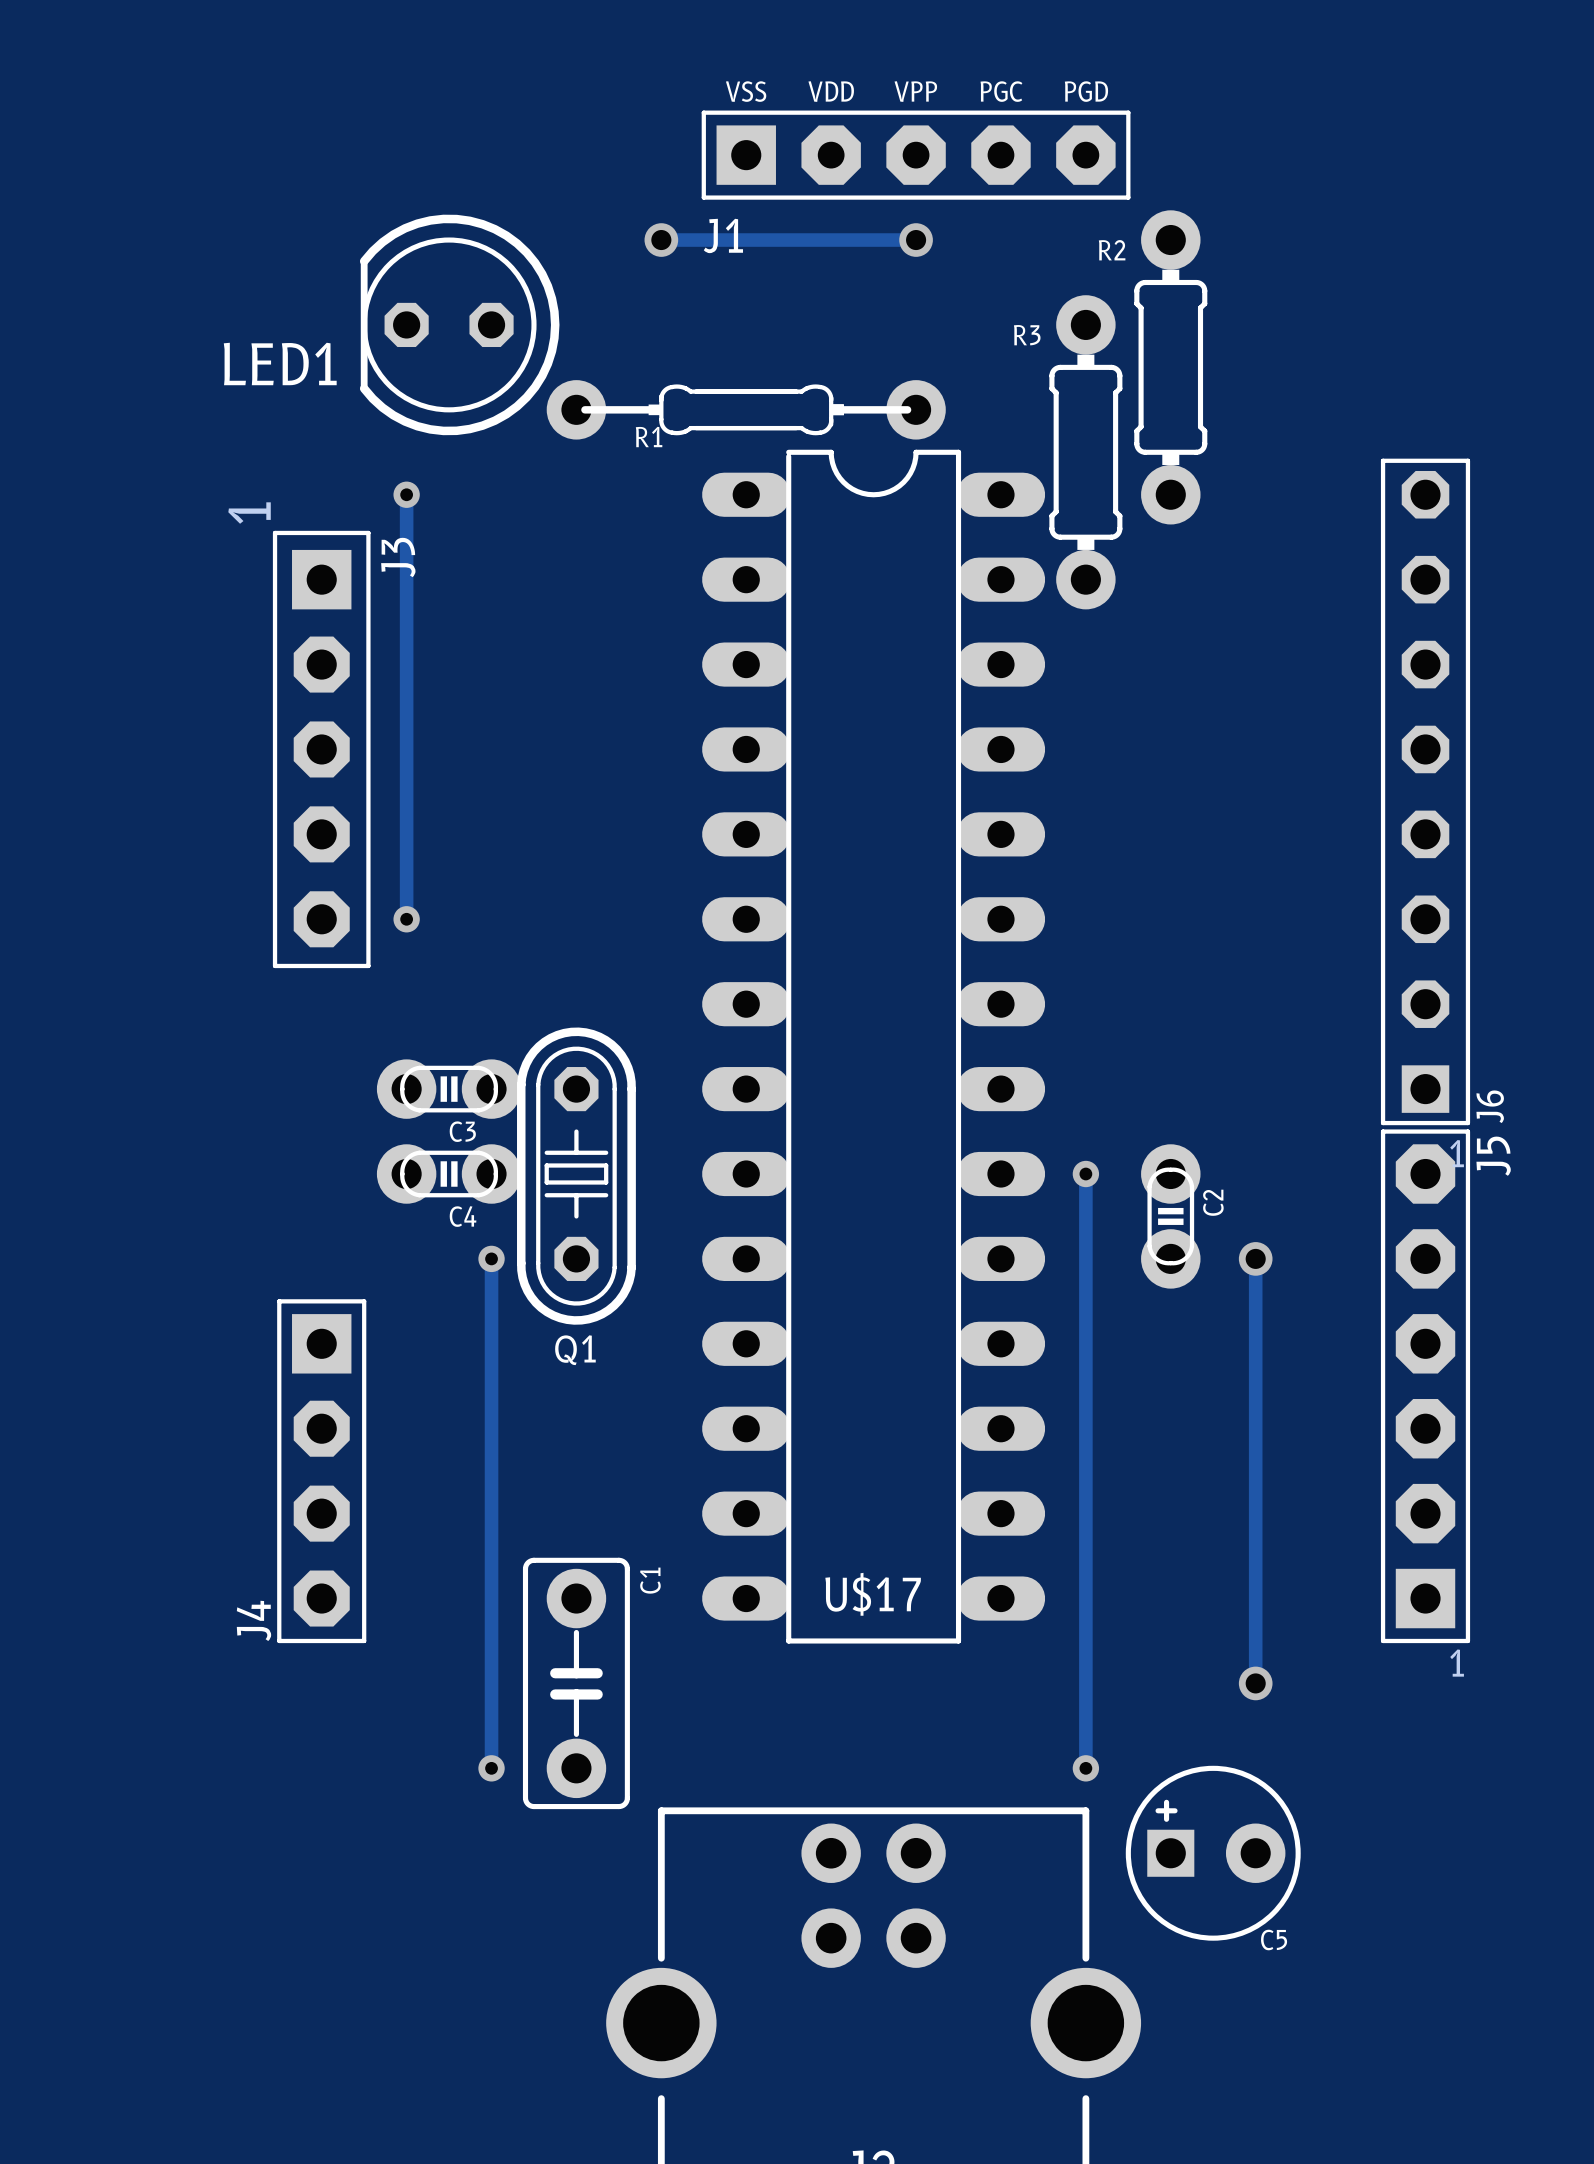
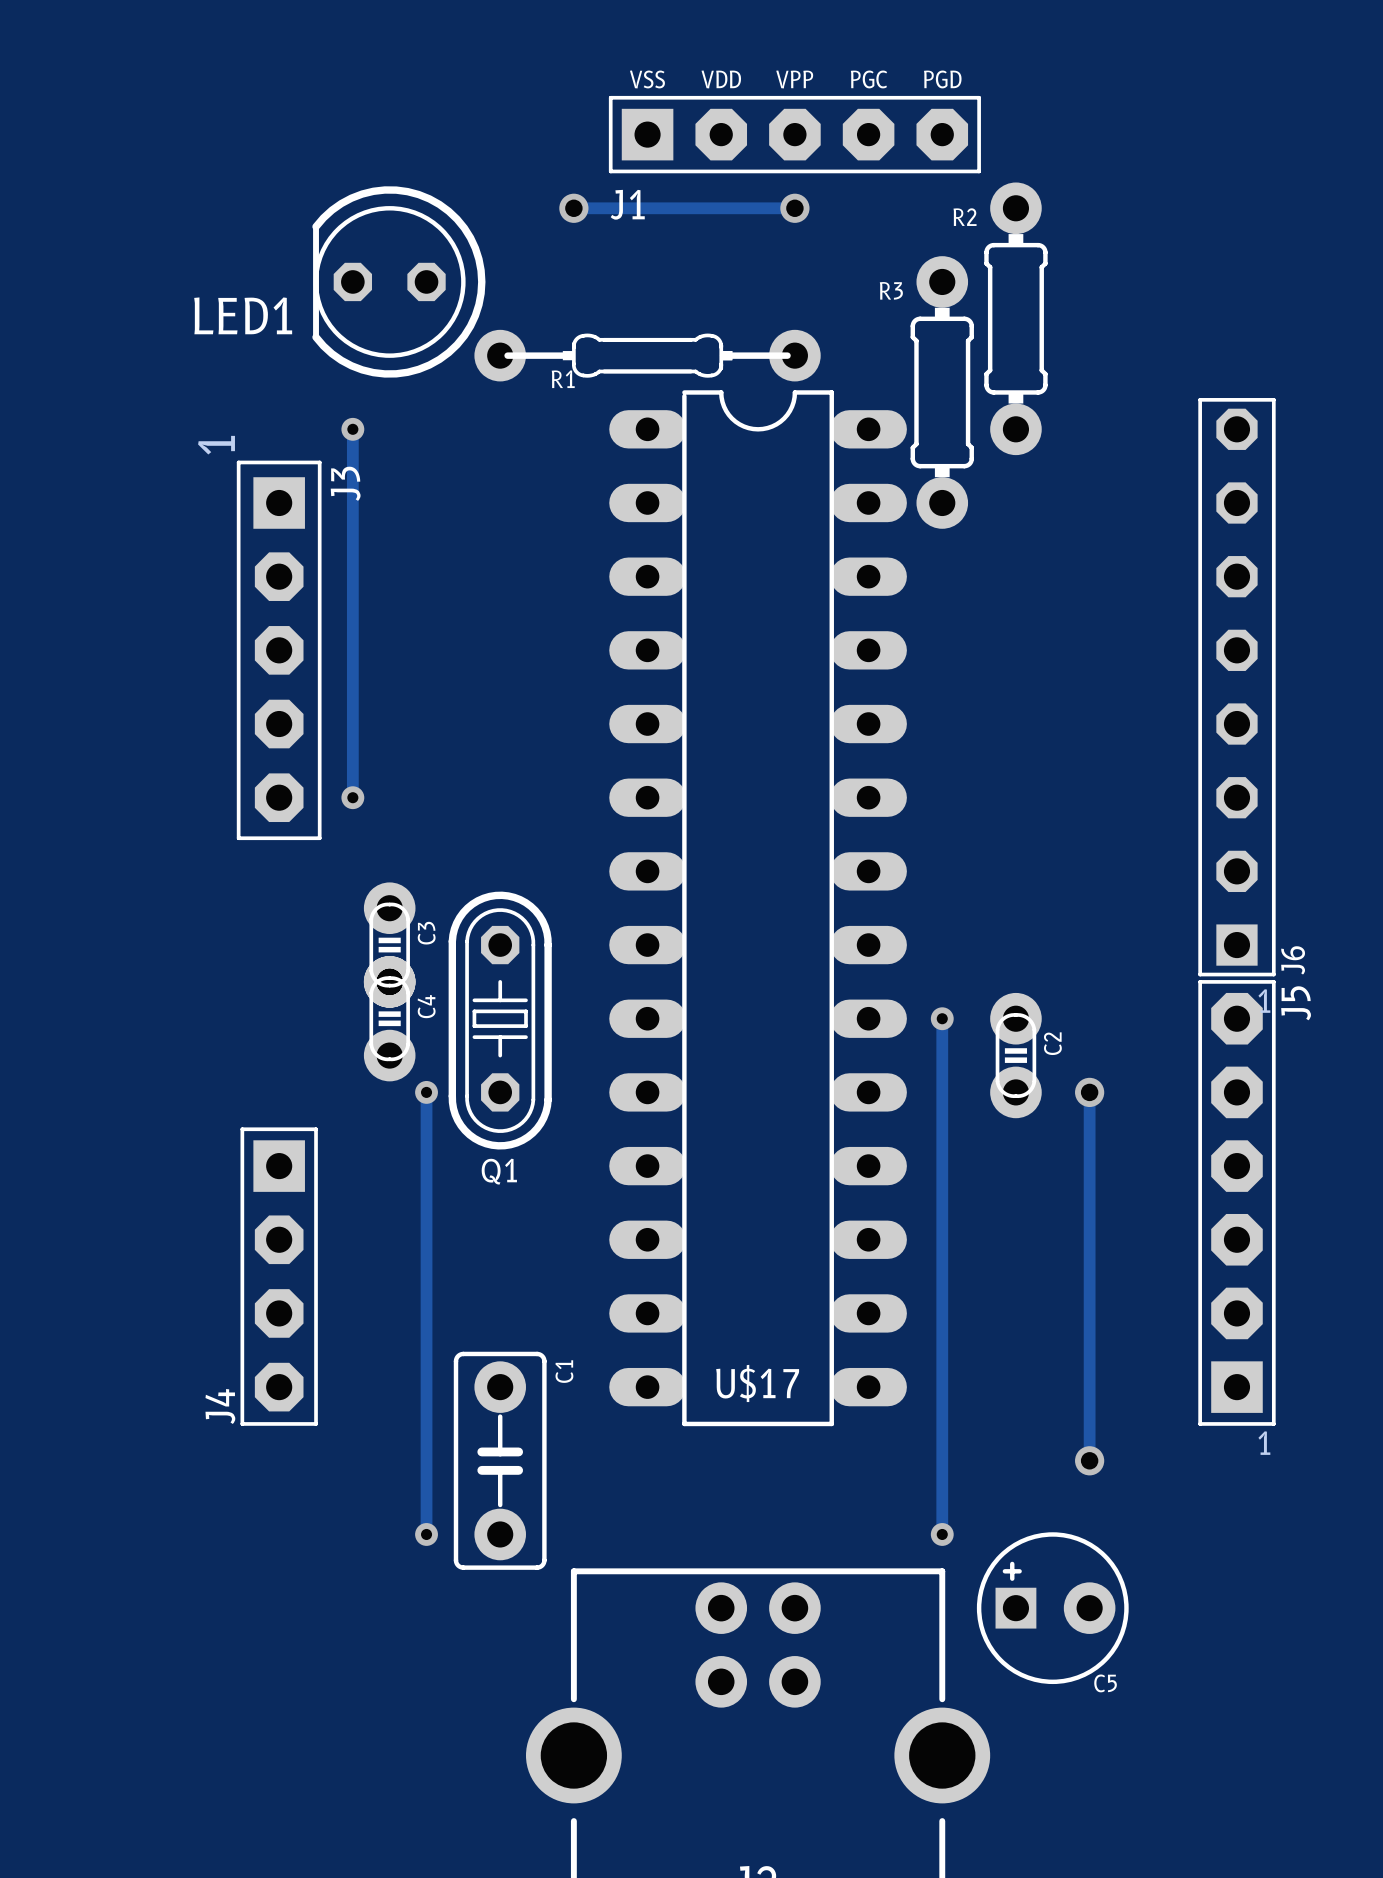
C3 rotation: 0° (449, 1089) -> 90° clockwise (389, 945)
C4 rotation: 0° (449, 1174) -> 90° clockwise (389, 1018)

